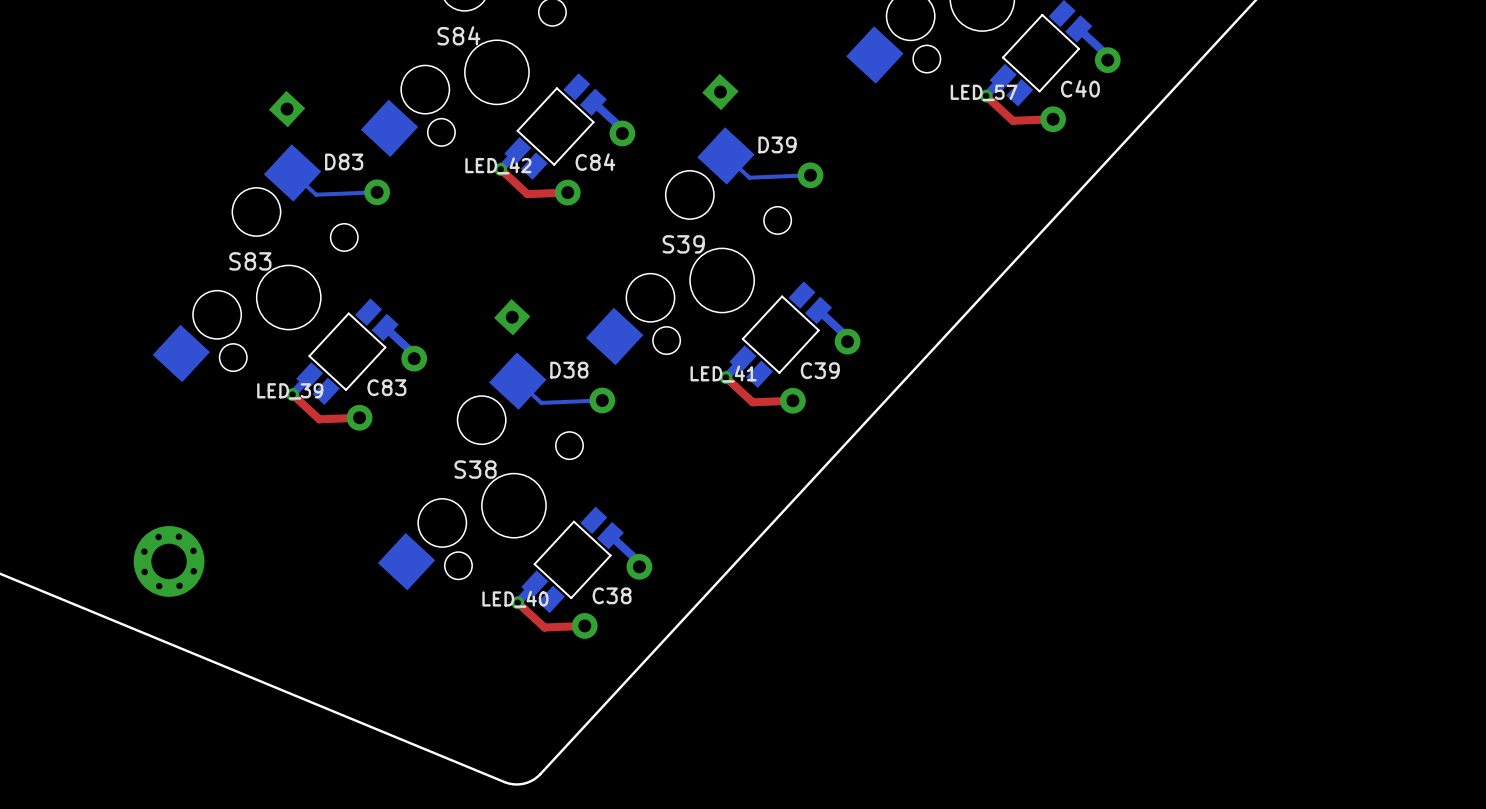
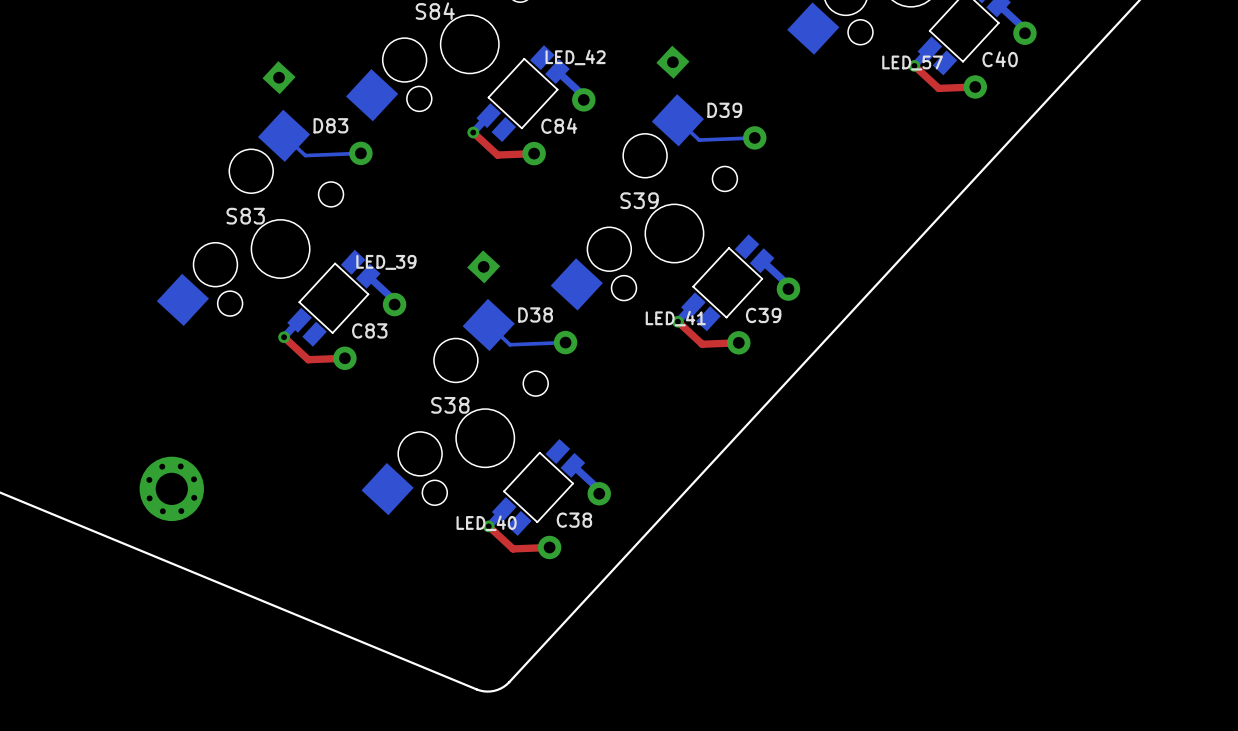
text position: LED_42 (498, 165) -> LED_42 (575, 57)
text position: LED_39 (290, 391) -> LED_39 (386, 262)

